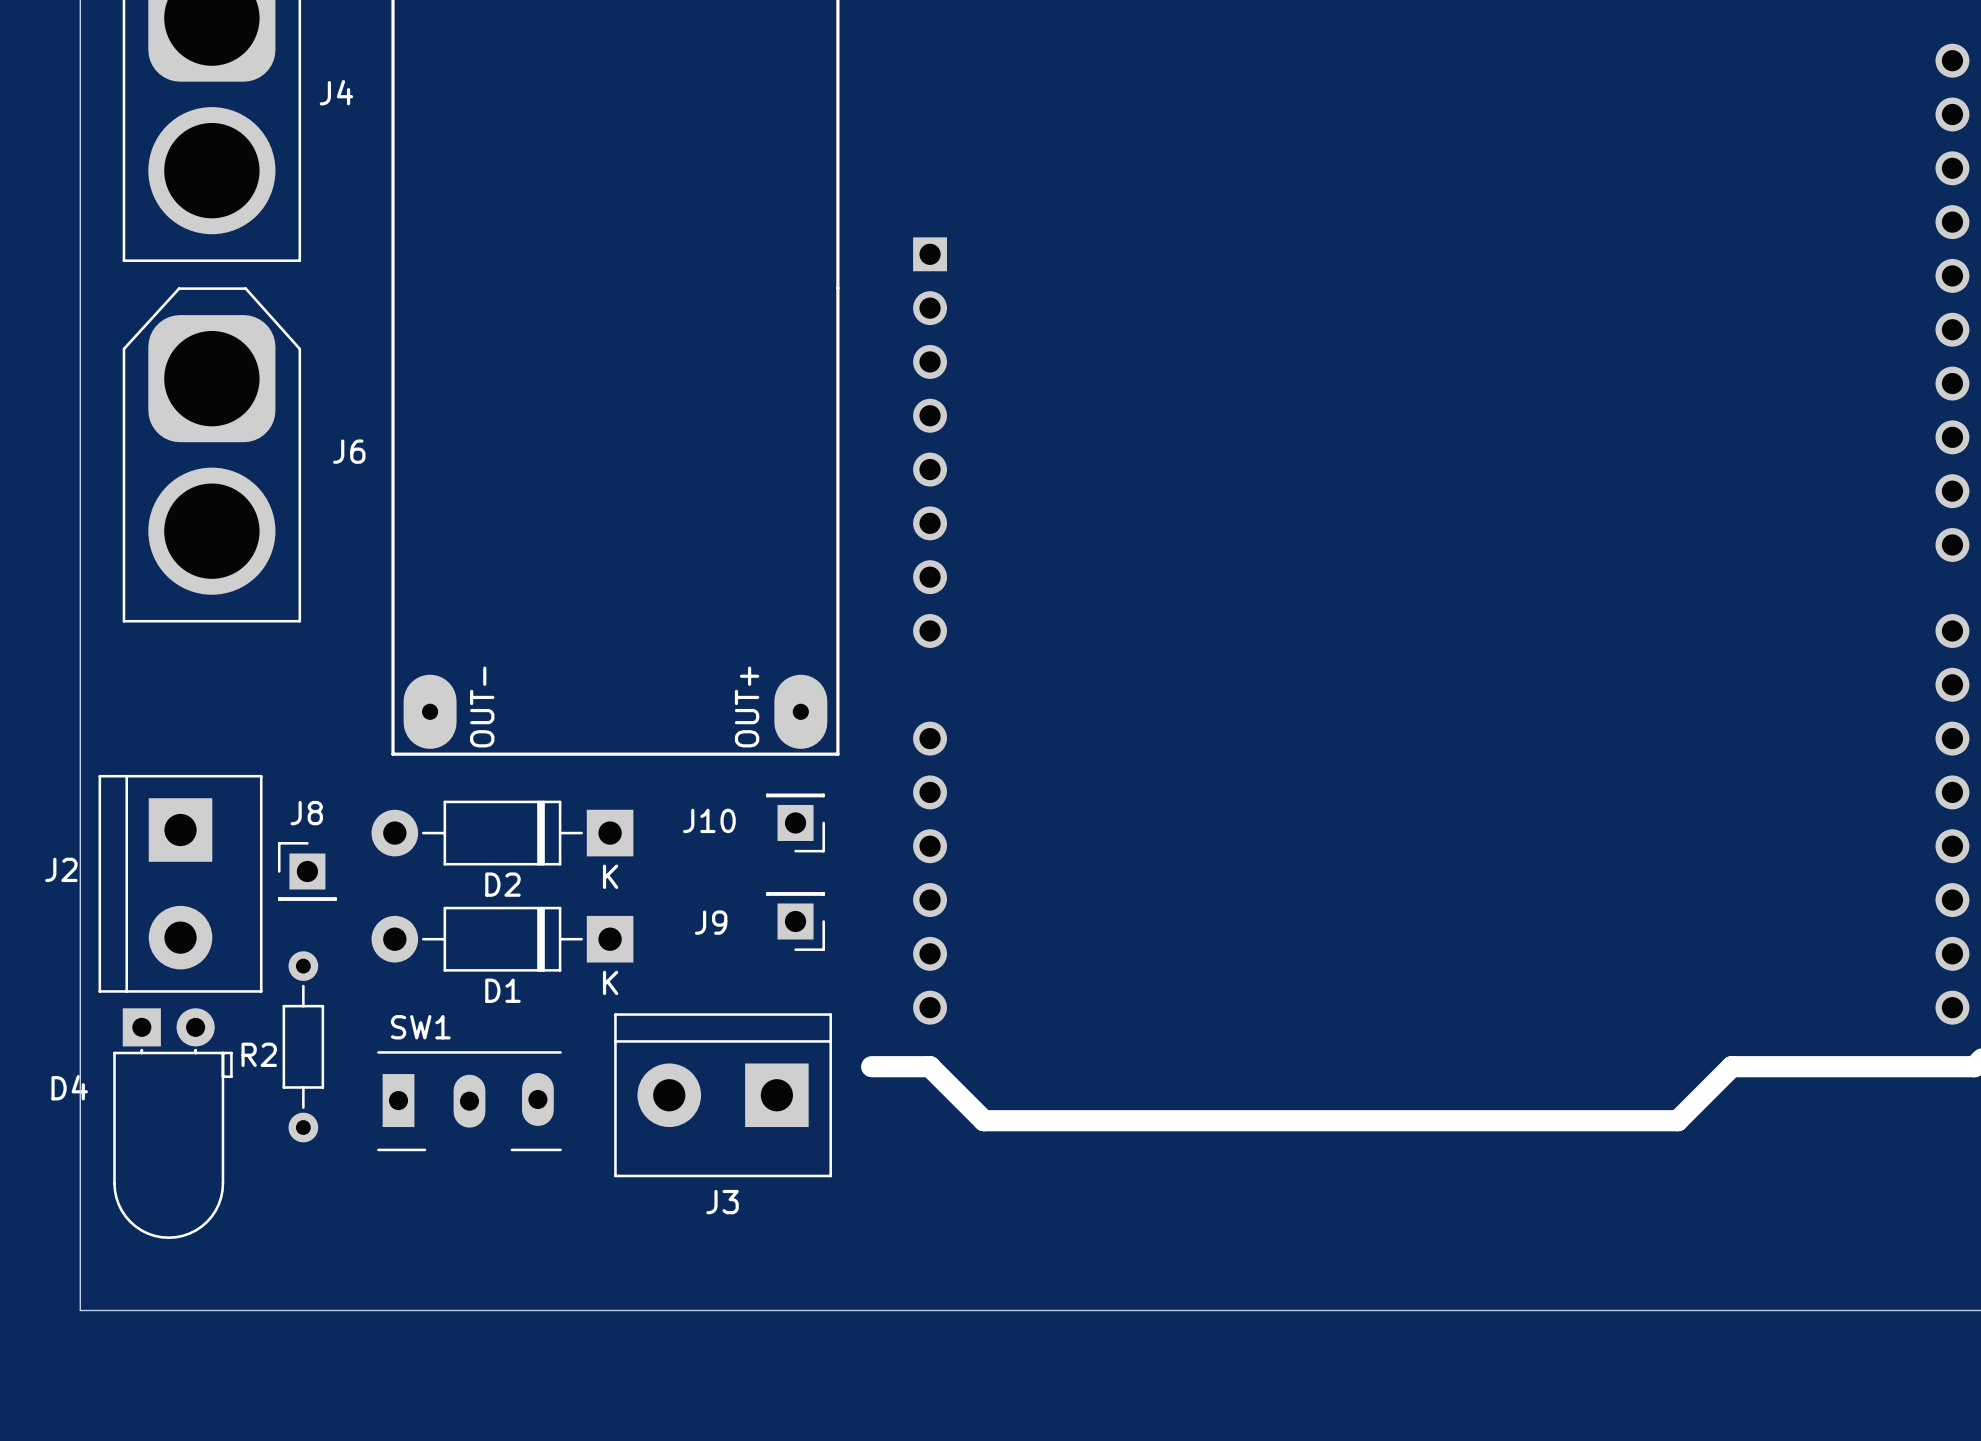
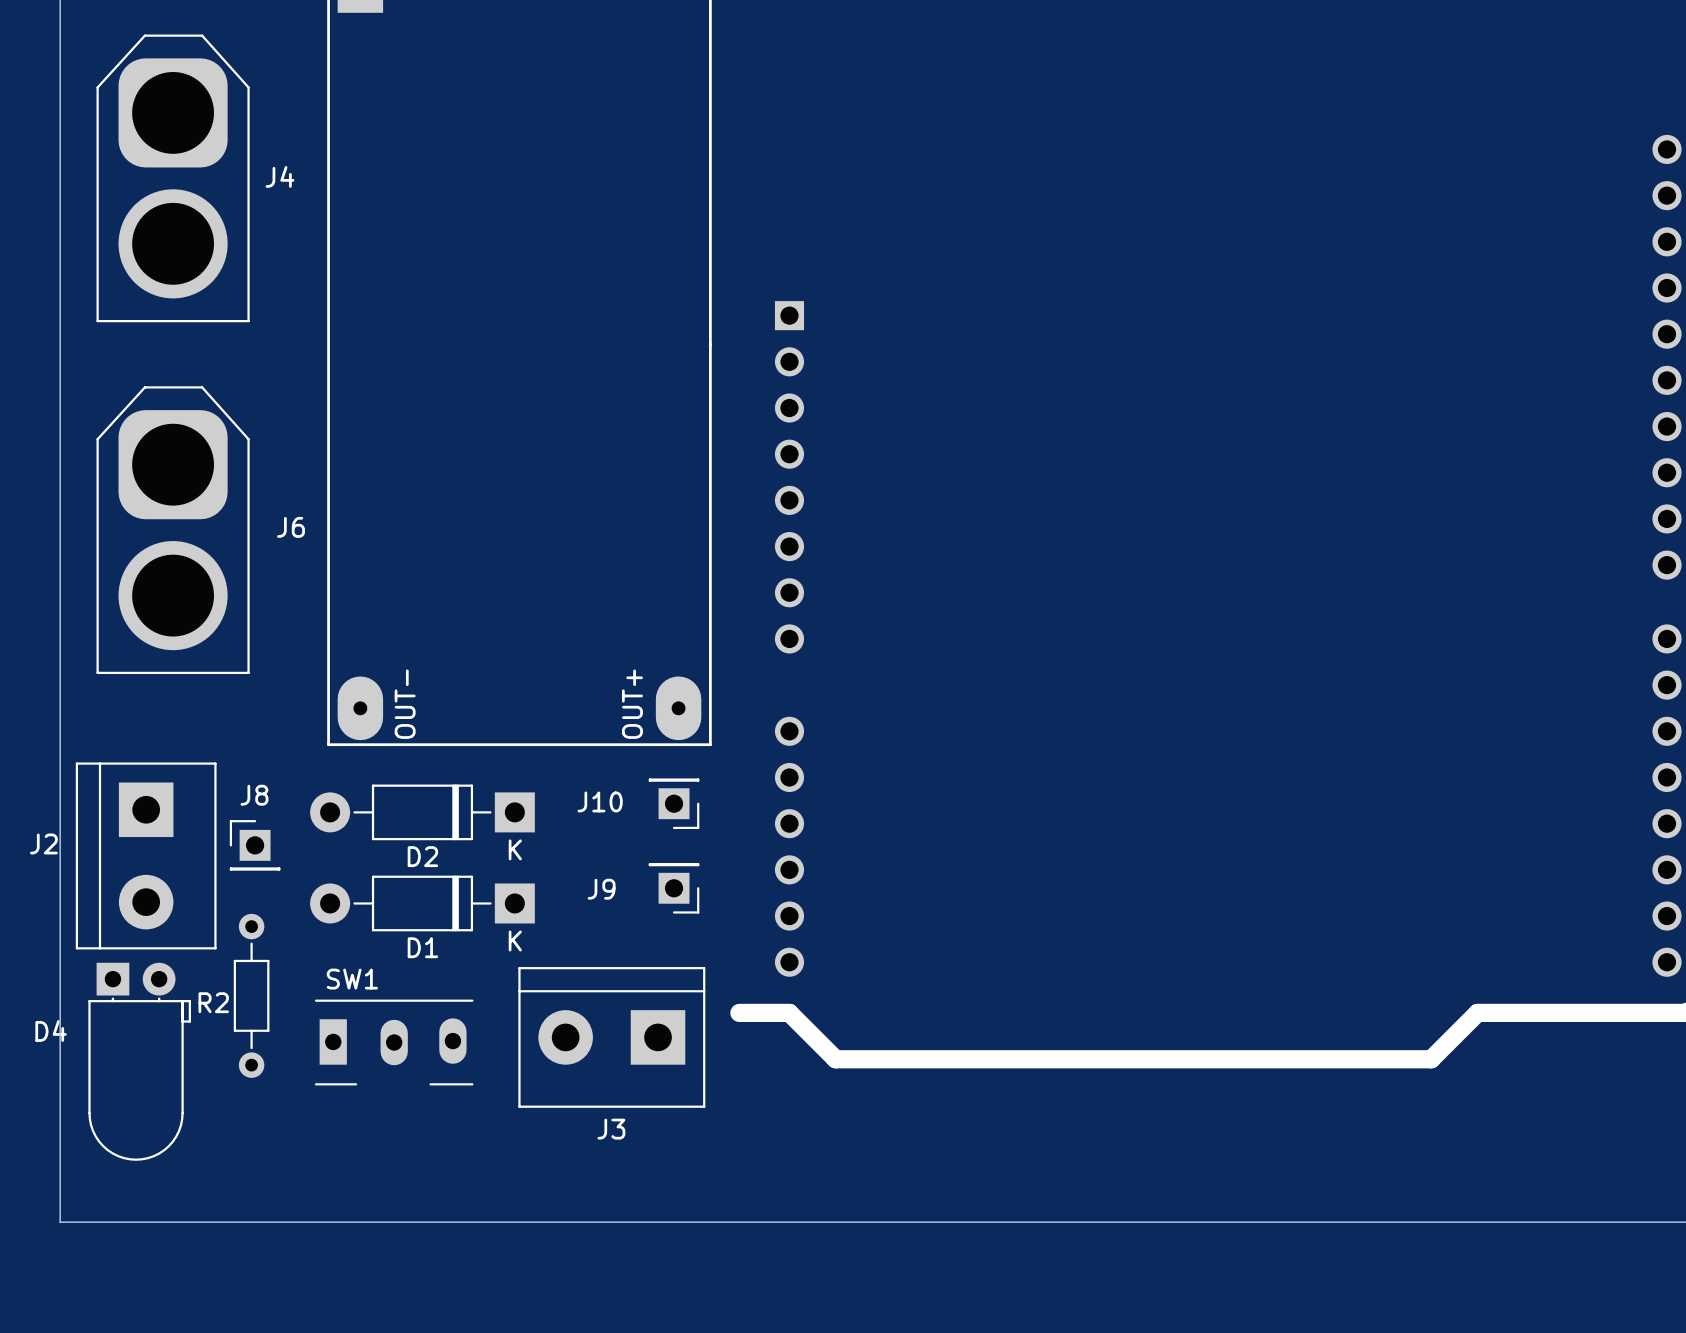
J6 position: (211, 454) -> (173, 530)

